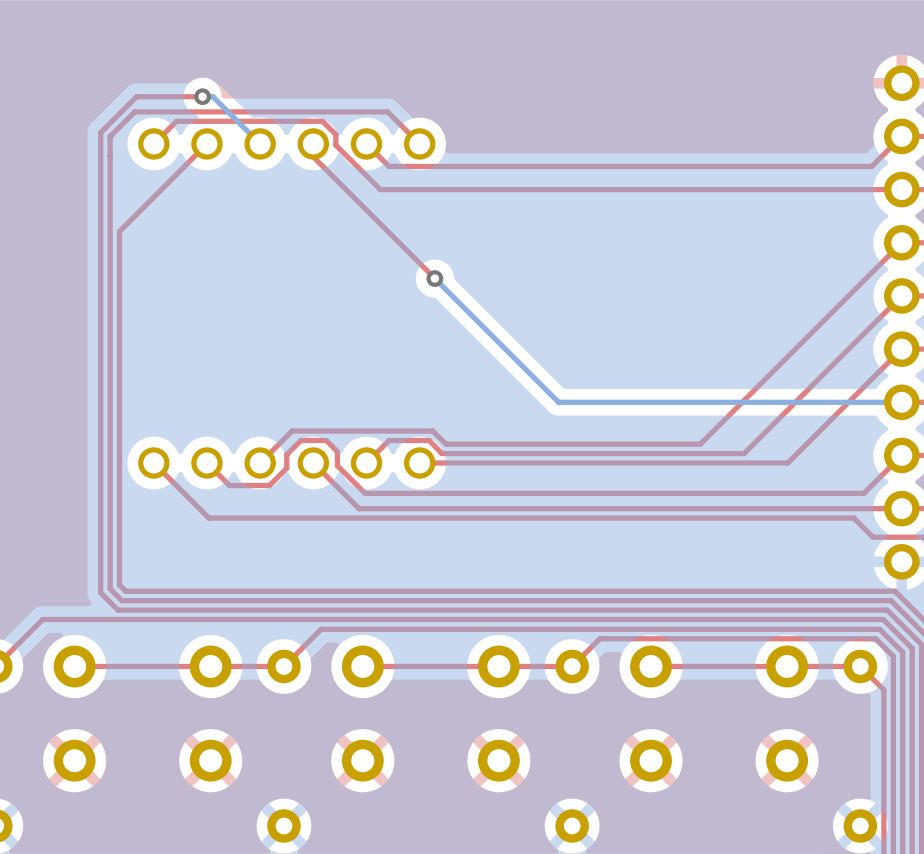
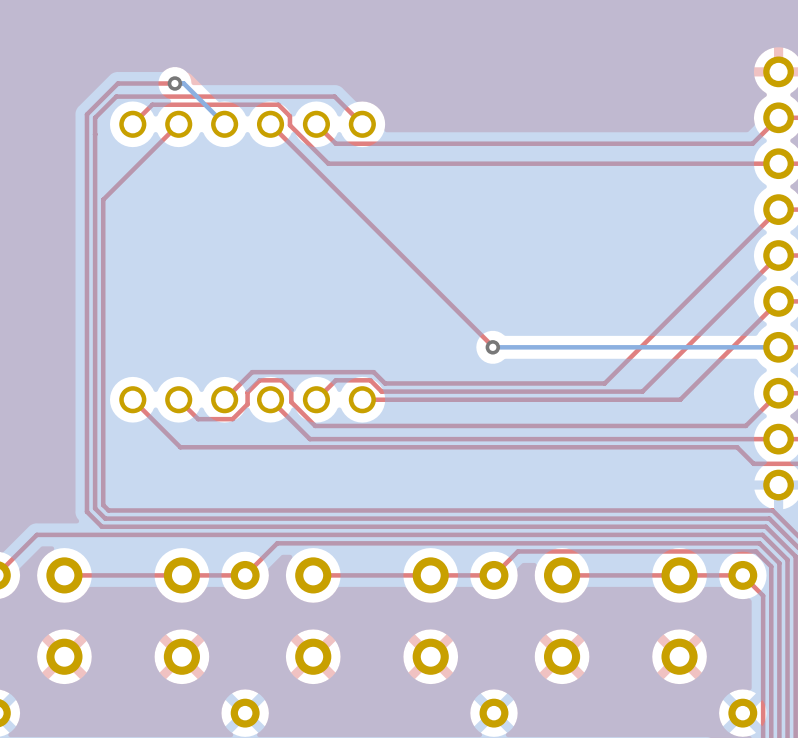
top track: none -> (270, 124) (492, 347)
top track: (313, 156) (434, 278) -> none
bottom track: (434, 278) (558, 402) (570, 402) -> none
via: (434, 278) -> none
via: none -> (492, 347)

